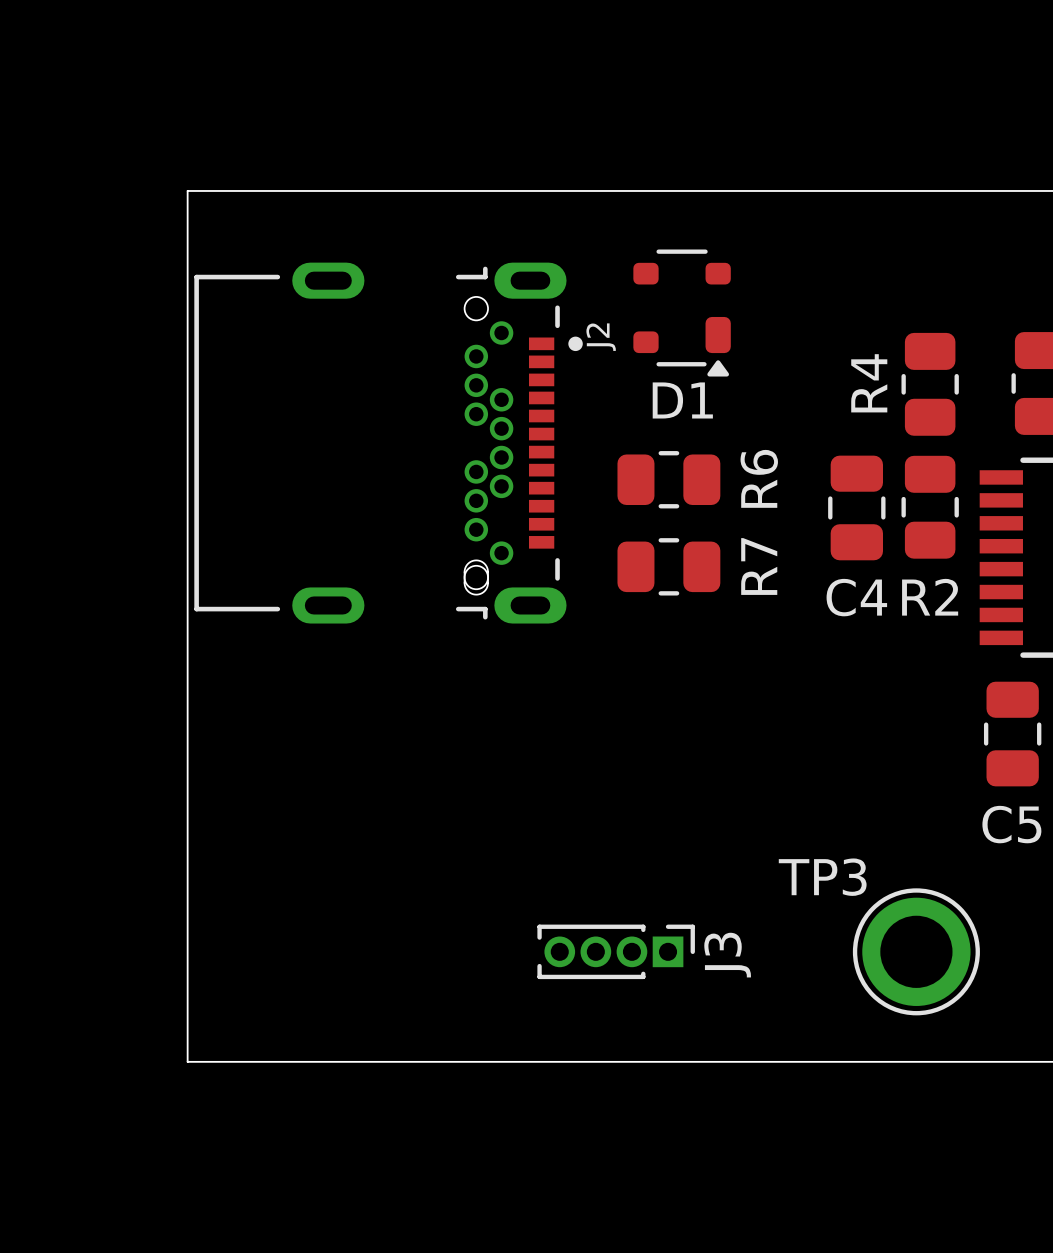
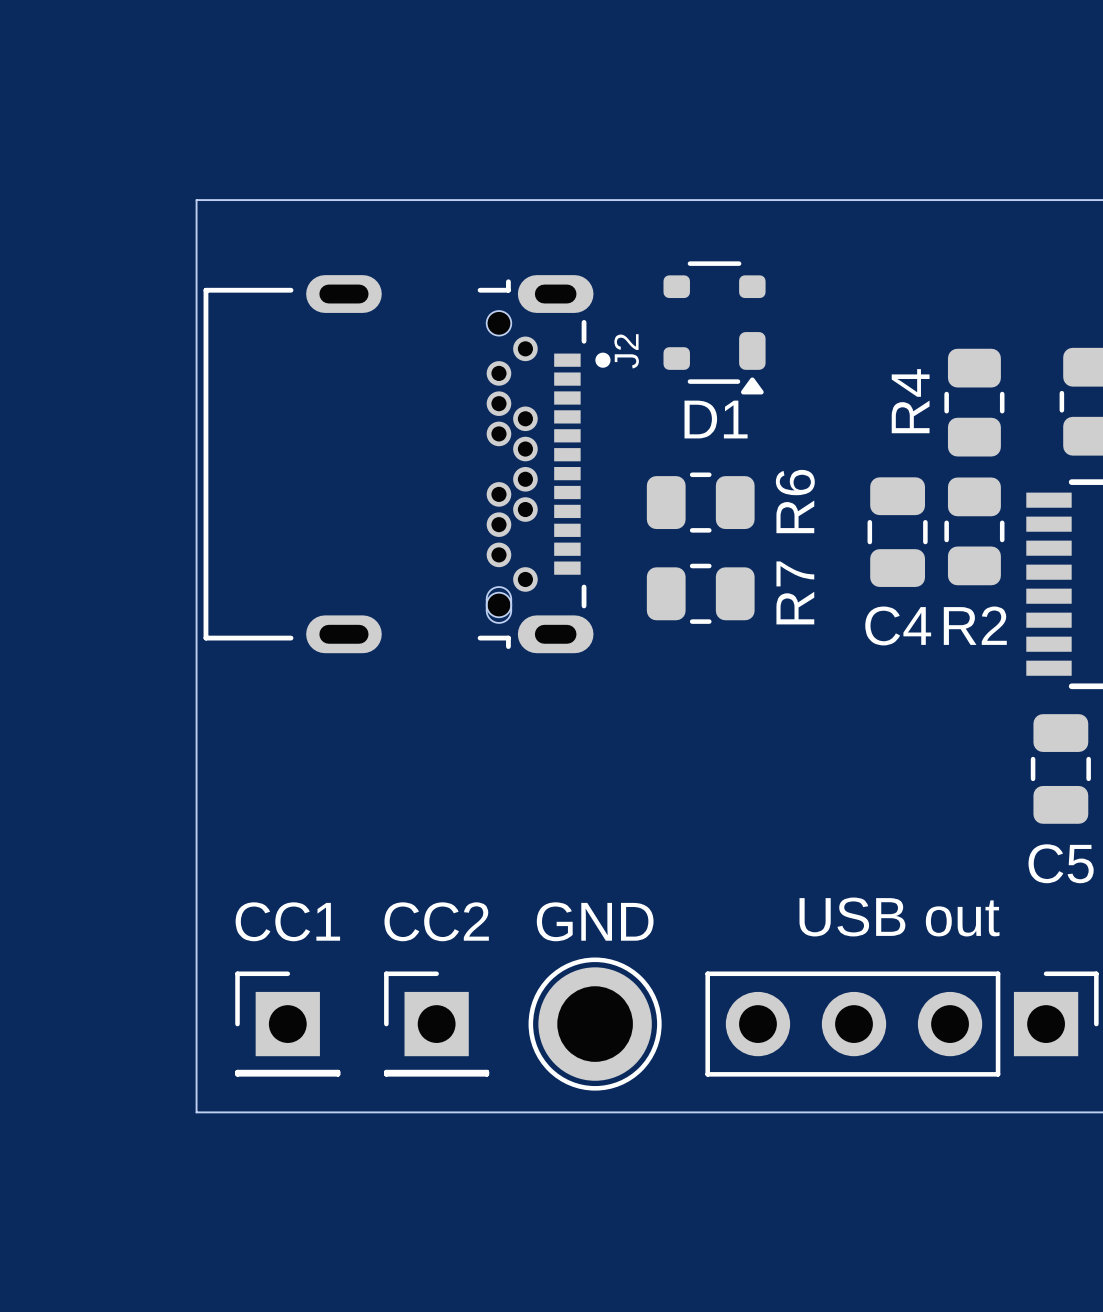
J3: (616, 951) -> none
TP3: (916, 951) -> none
CC1: none -> (287, 1024)
CC2: none -> (436, 1024)
GND: none -> (595, 1024)
USB out: none -> (902, 1024)

